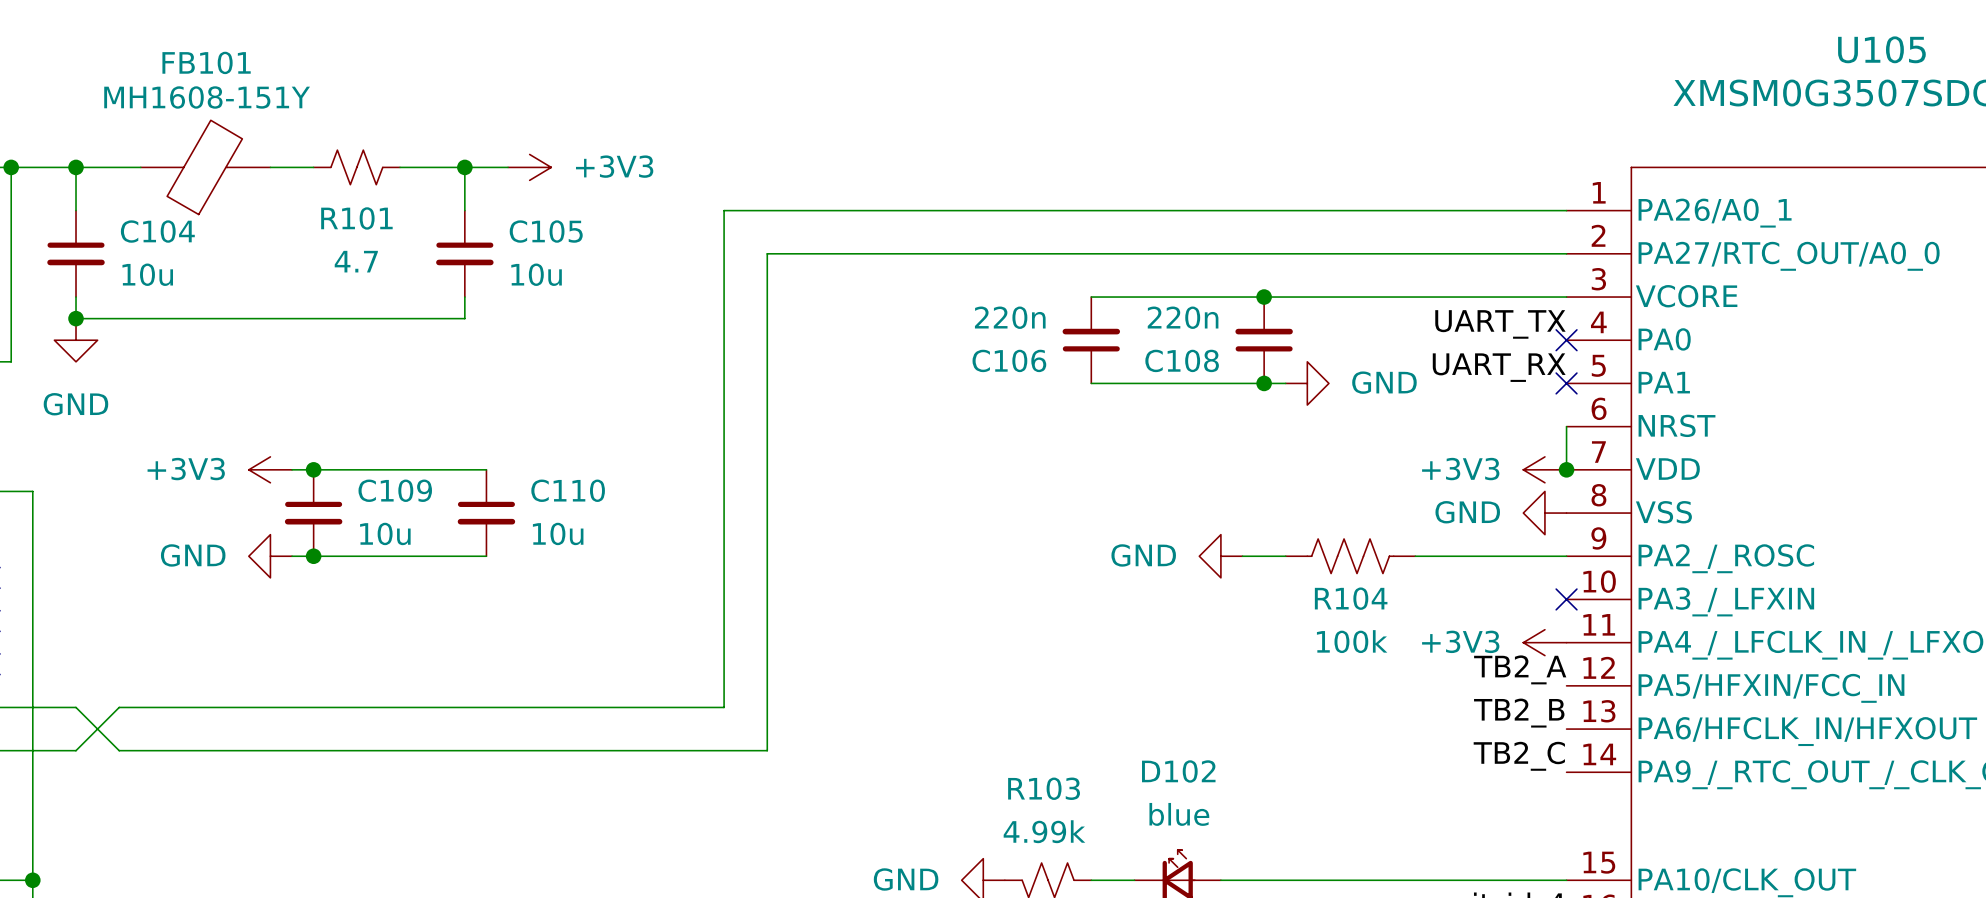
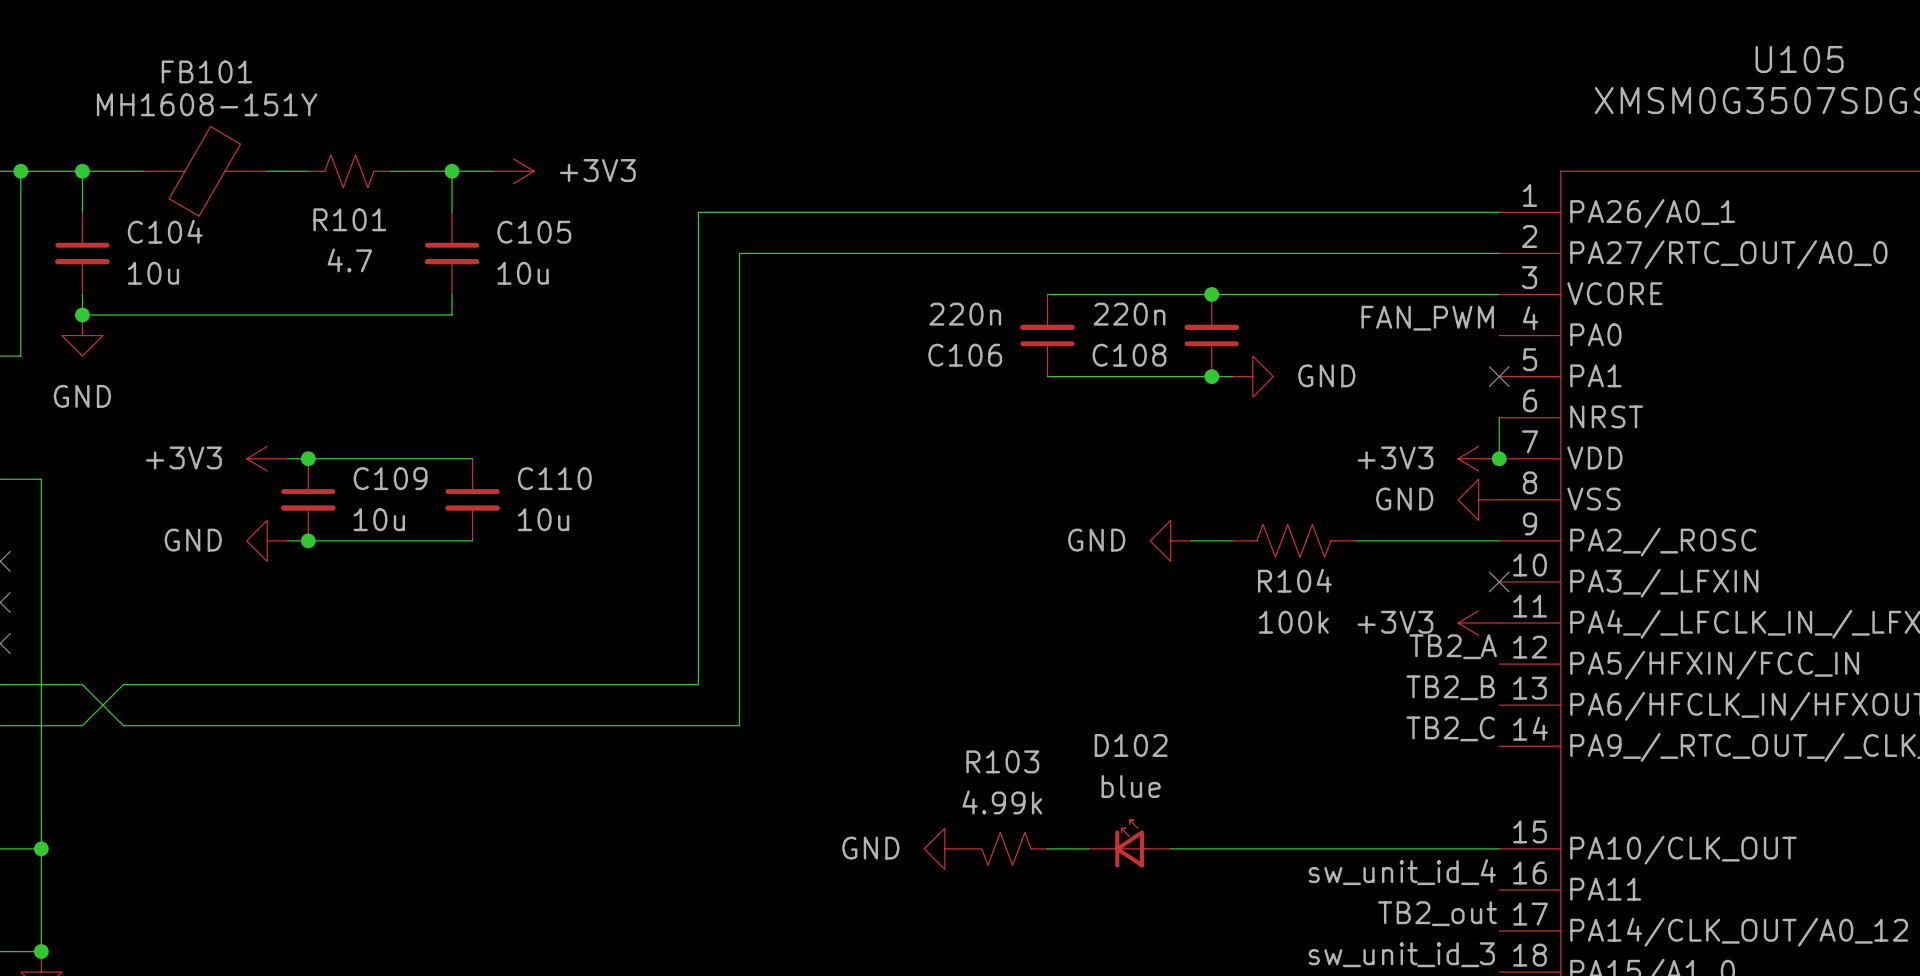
label: UART_TX (1500, 324) -> FAN_PWM (1427, 318)
no-connect mark: (1566, 340) -> none
label: UART_RX (1499, 367) -> none

